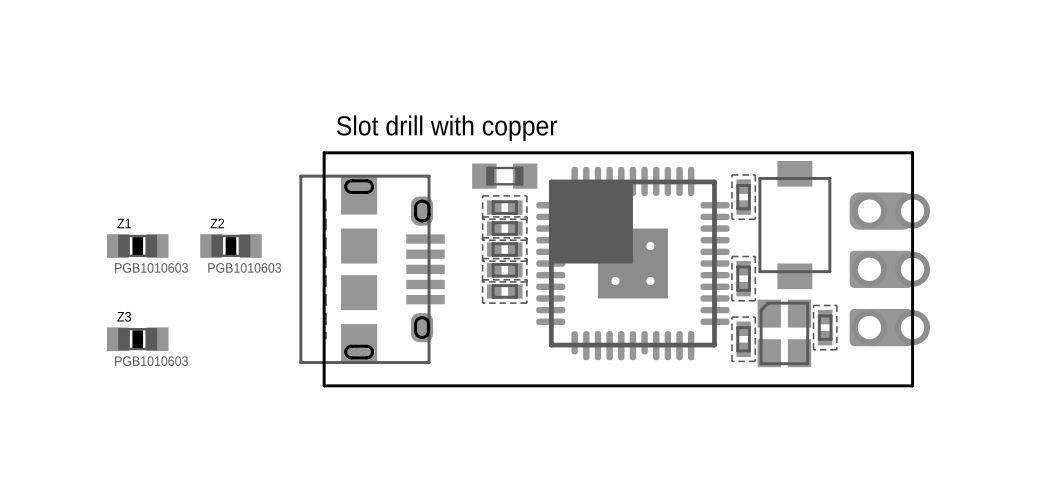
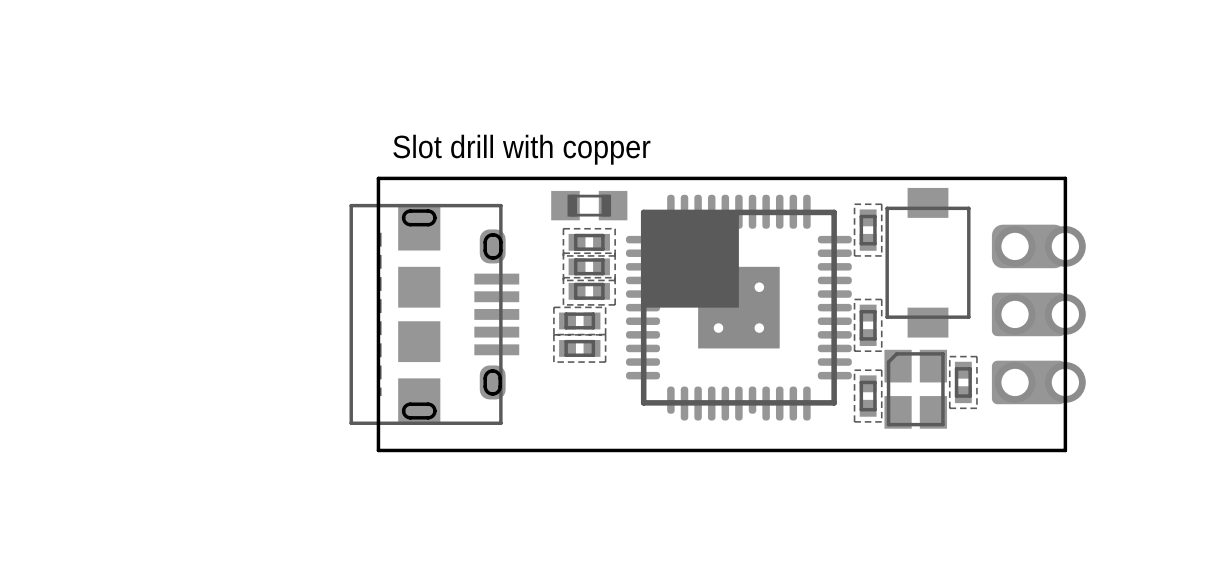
Z1: PGB1010603 (137, 246) -> none
Z2: PGB1010603 (230, 246) -> none
part: (504, 270) -> none
part: none -> (579, 320)
part: (504, 291) -> none
part: none -> (579, 348)
Z3: PGB1010603 (137, 339) -> none

